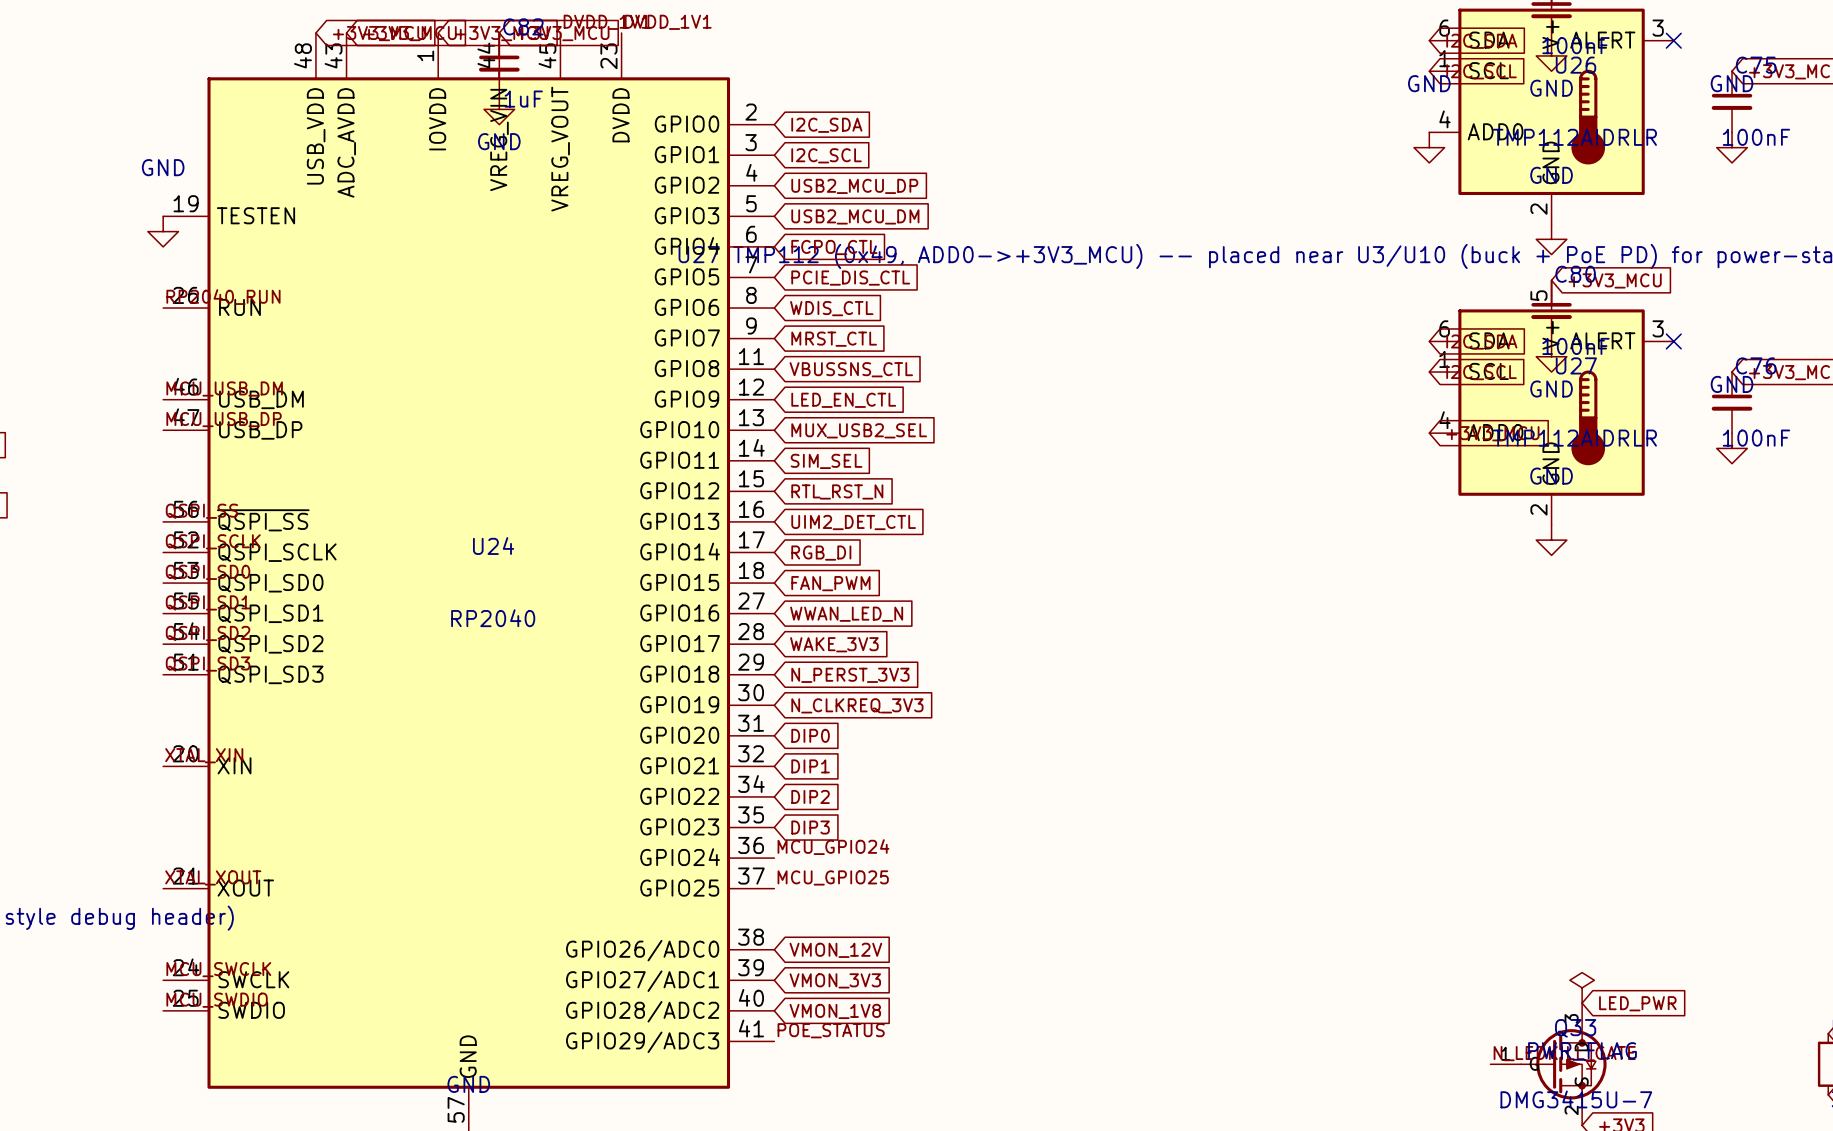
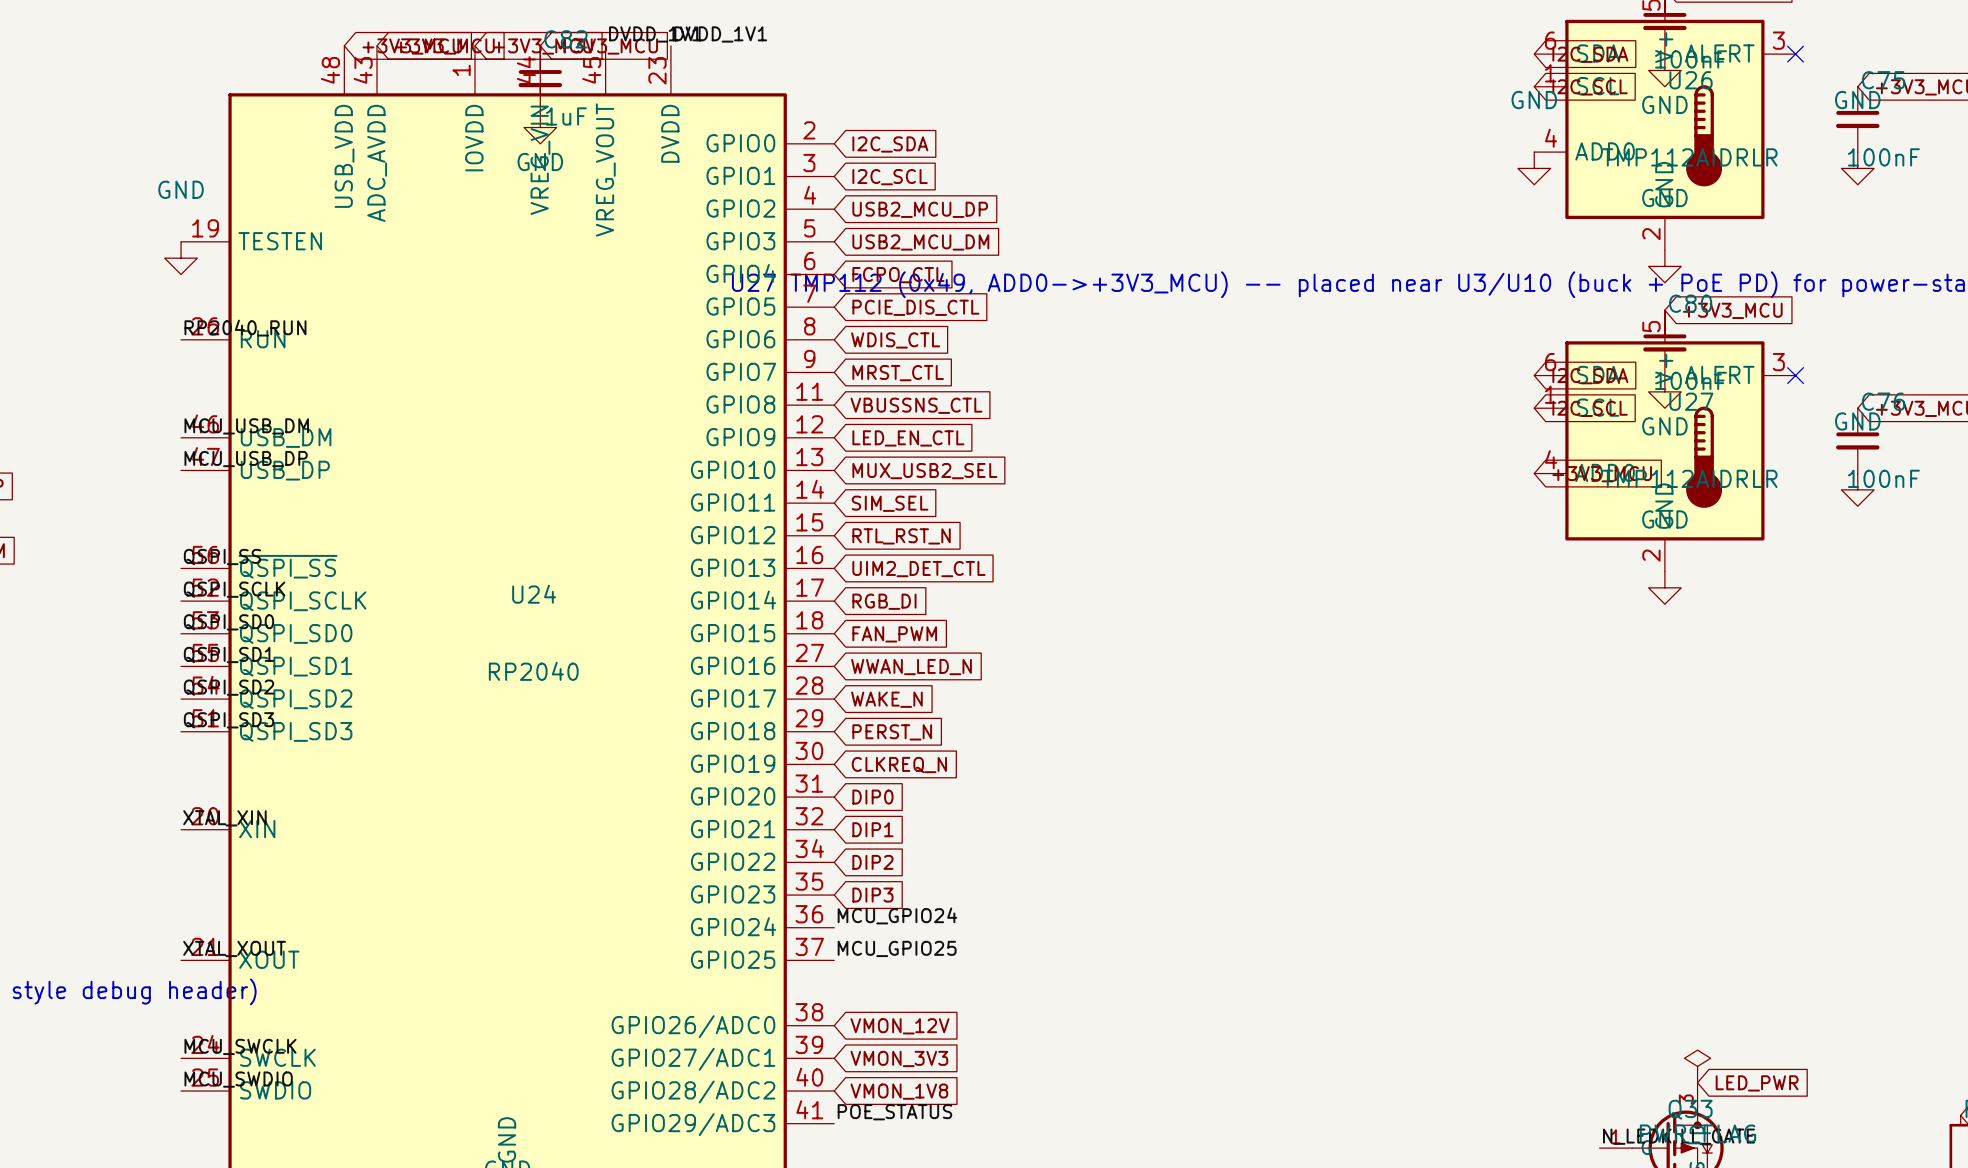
global label: WAKE_3V3 (834, 644) -> WAKE_N (886, 699)
global label: N_PERST_3V3 (850, 675) -> PERST_N (892, 732)
global label: N_CLKREQ_3V3 (857, 705) -> CLKREQ_N (899, 765)

